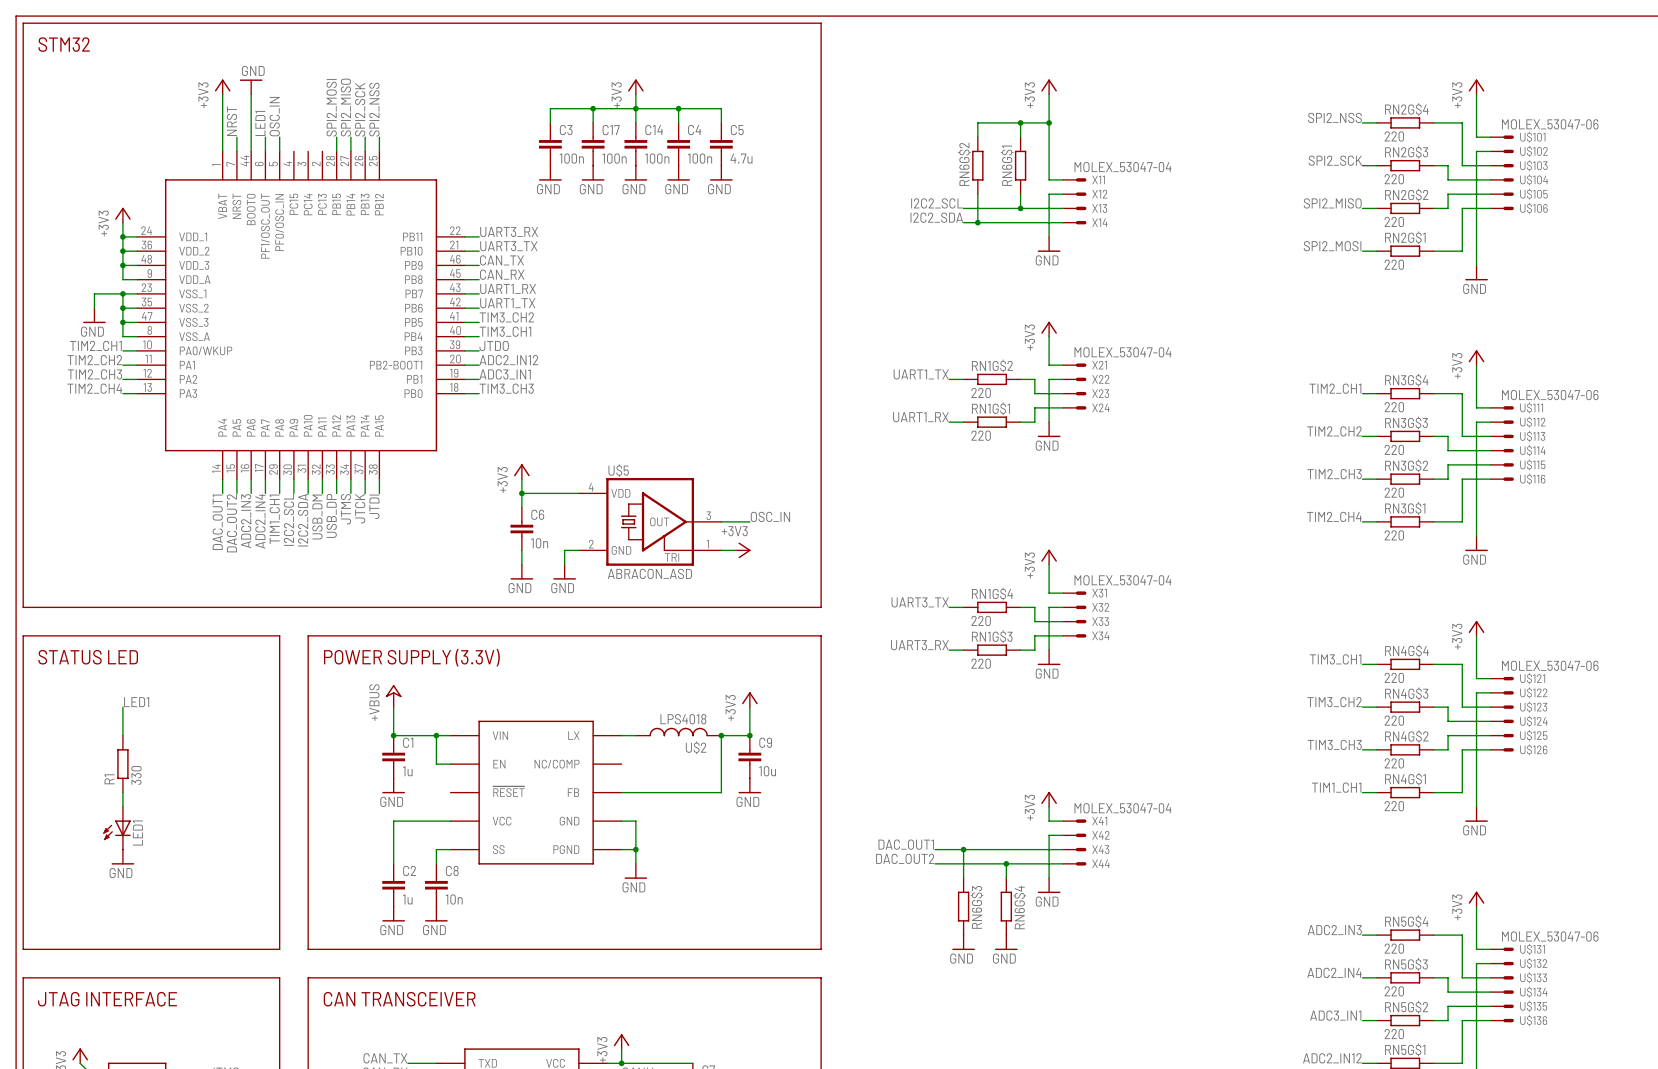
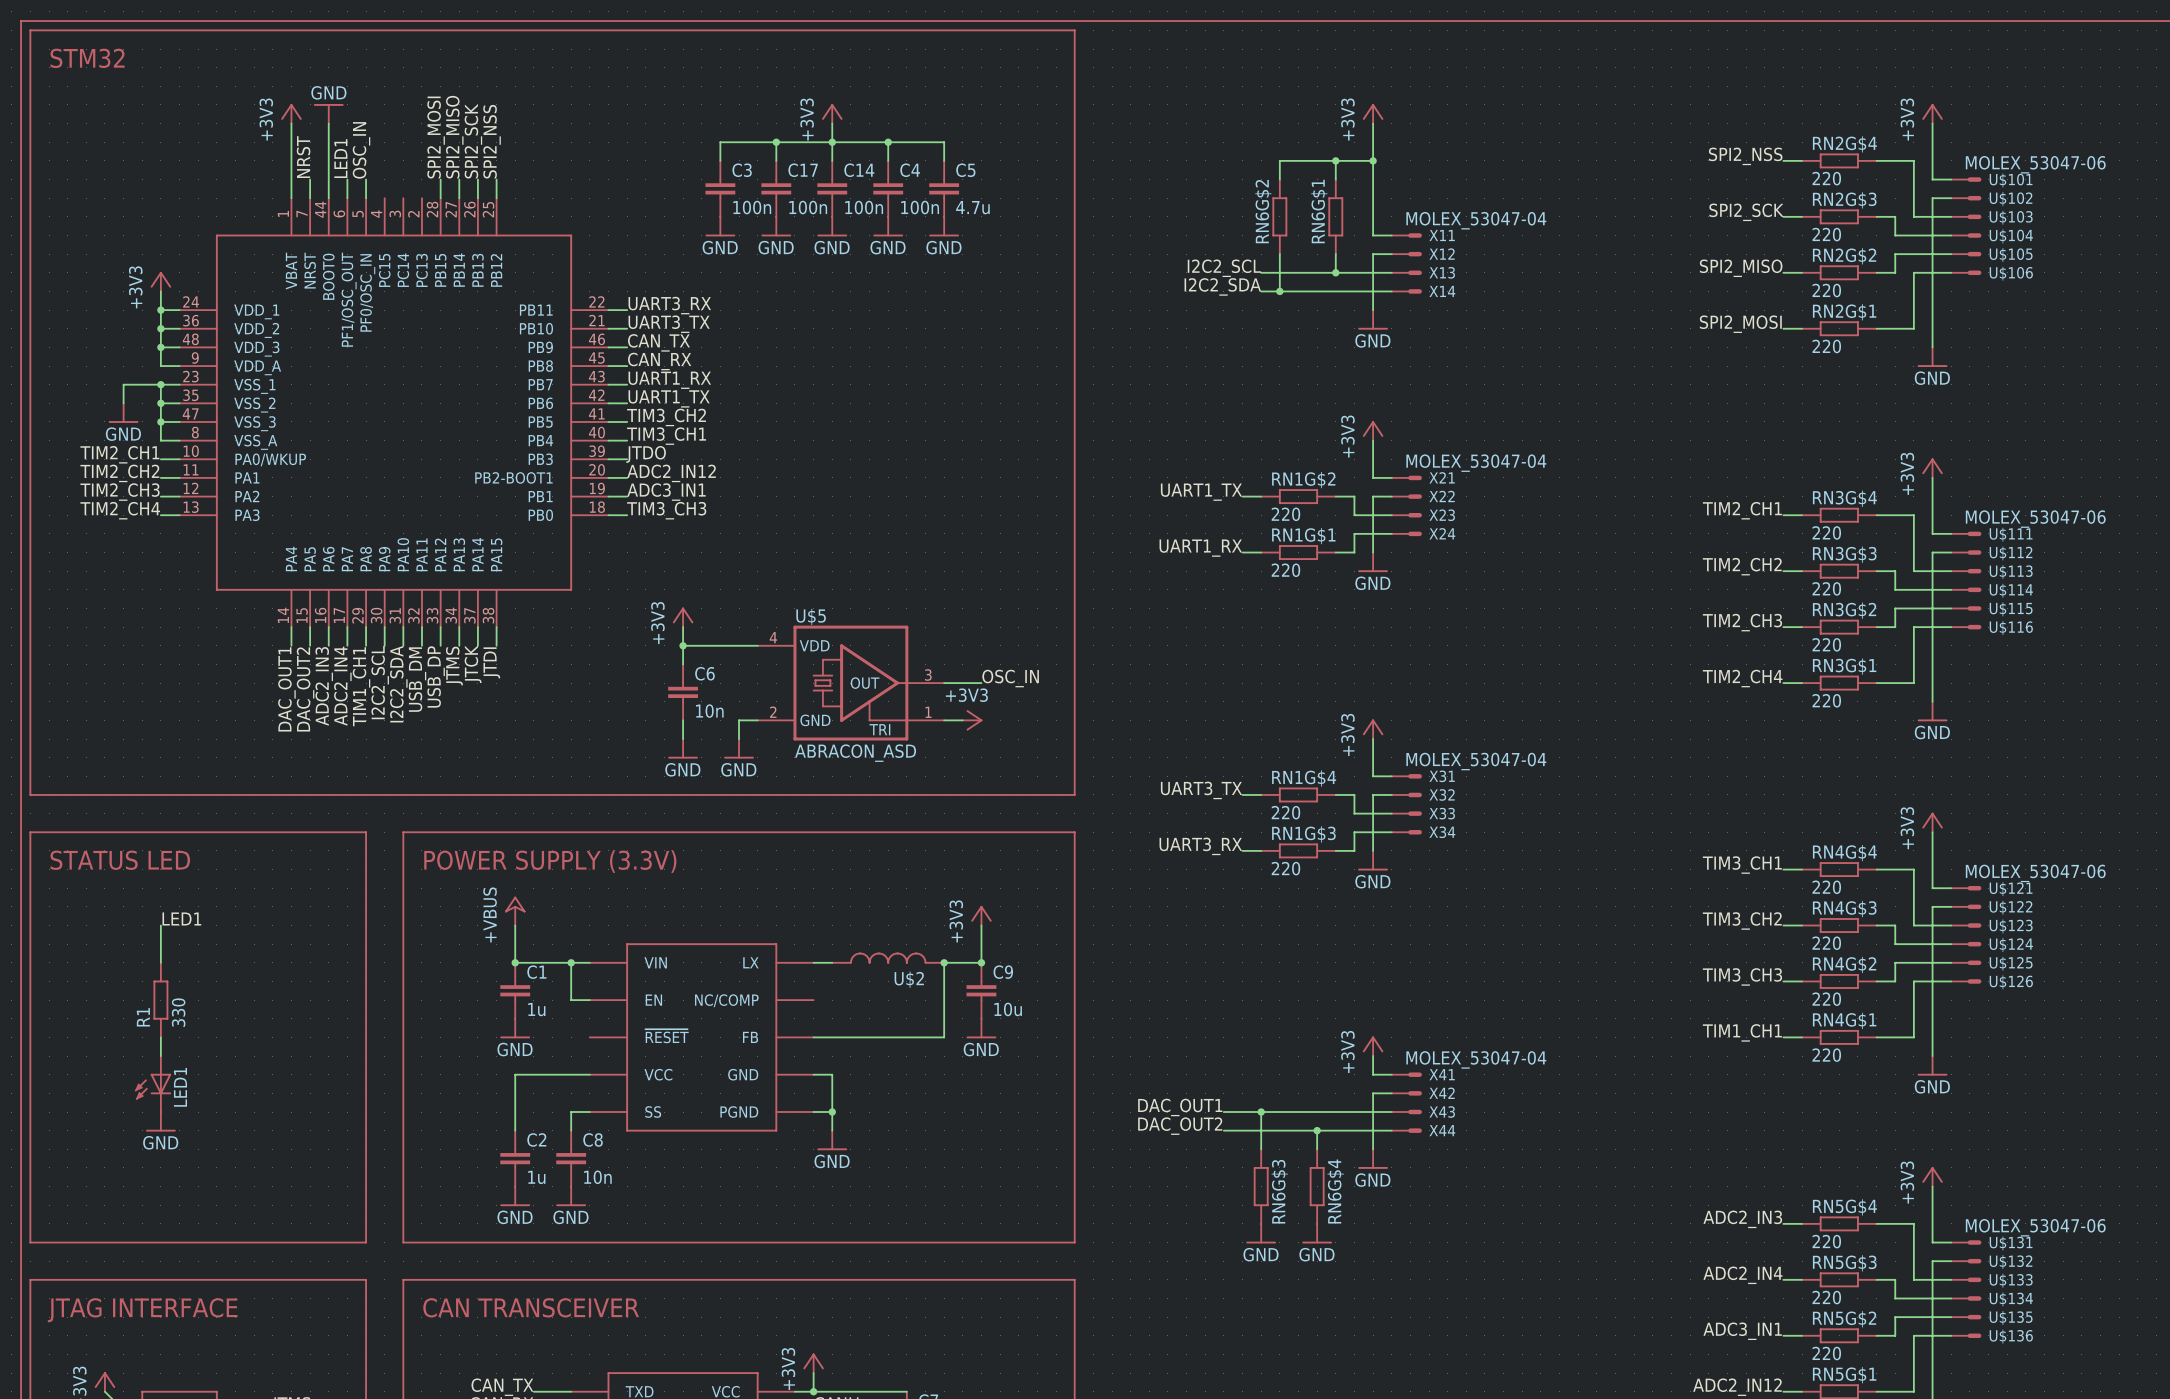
U$2 value: LPS4018 (683, 719) -> none

